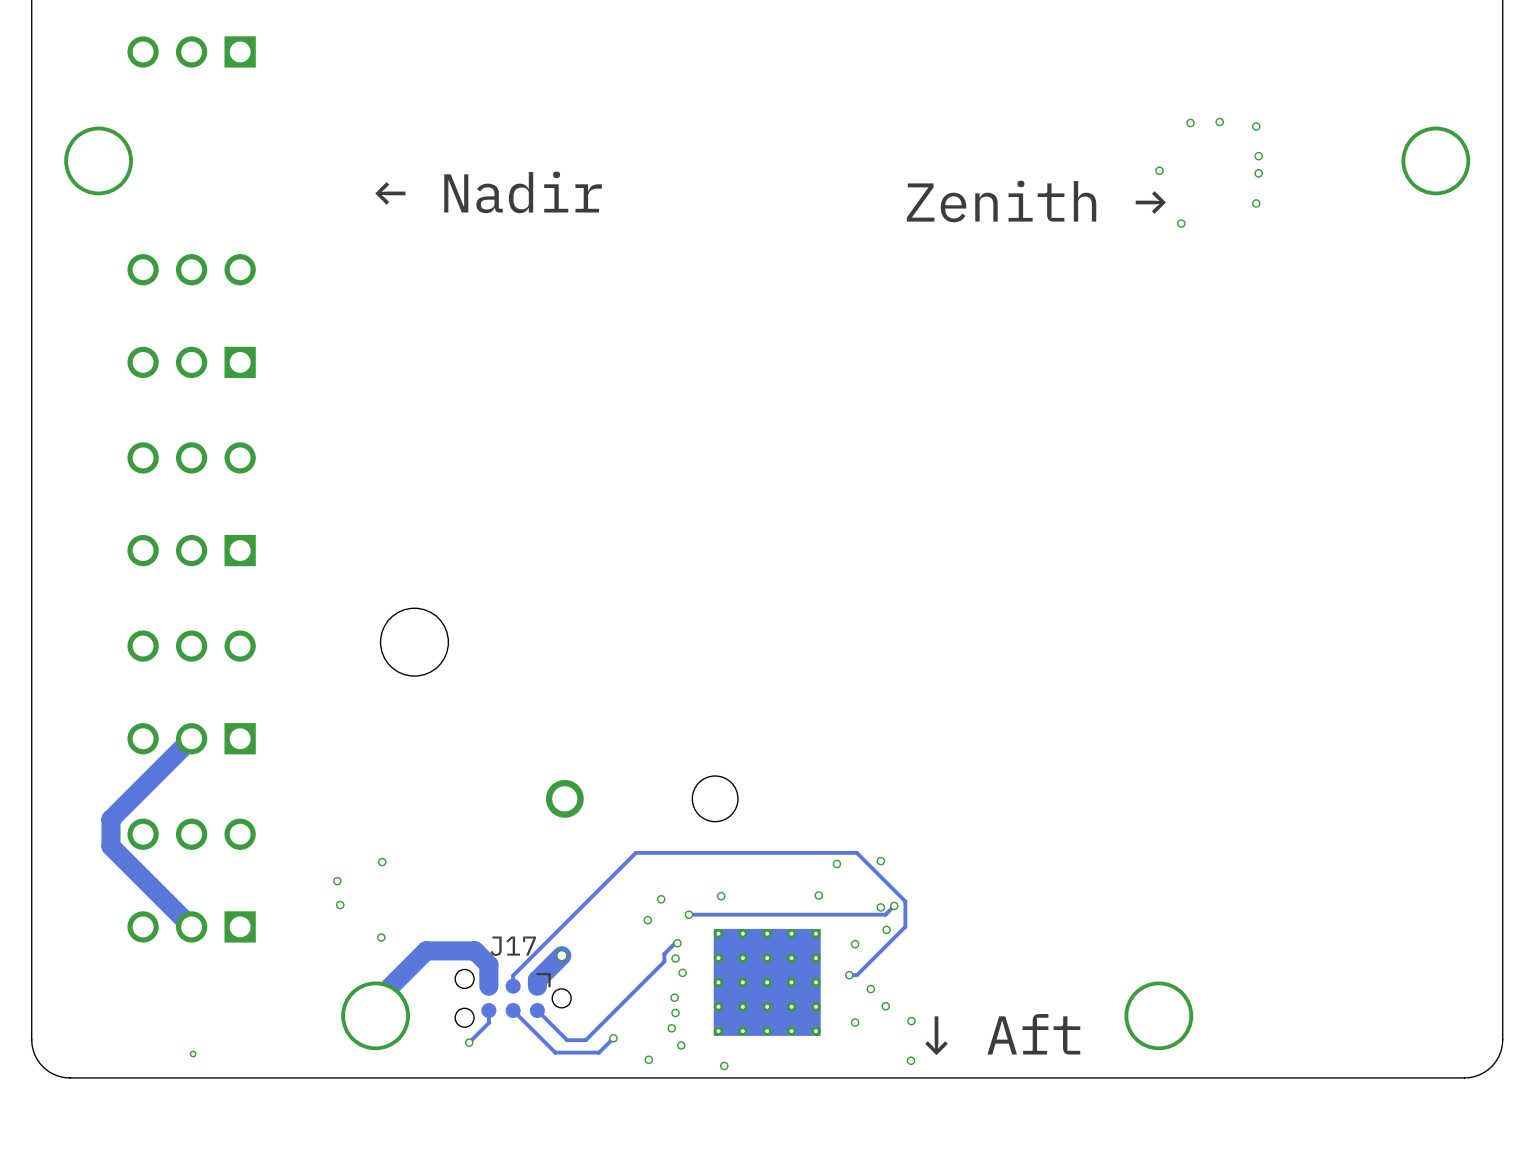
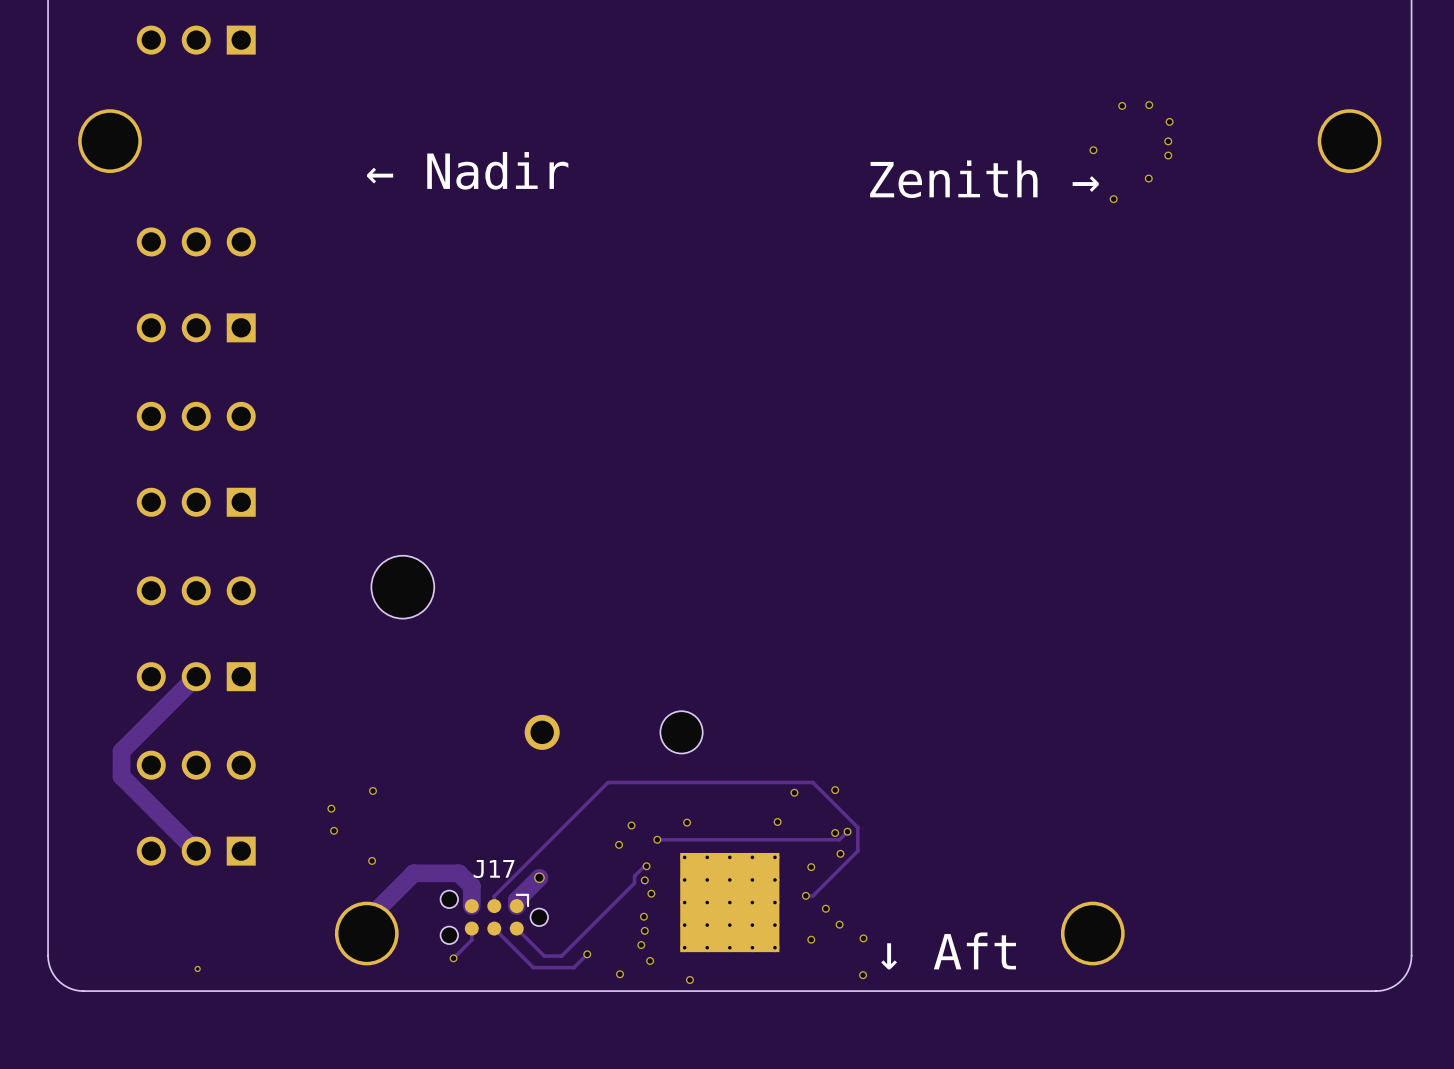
via: (1256, 126) -> none
via: none -> (1169, 121)
via: (1258, 156) -> none
via: none -> (1168, 141)
via: (1258, 173) -> none
via: none -> (1168, 155)
via: none -> (1148, 178)
via: (1256, 203) -> none

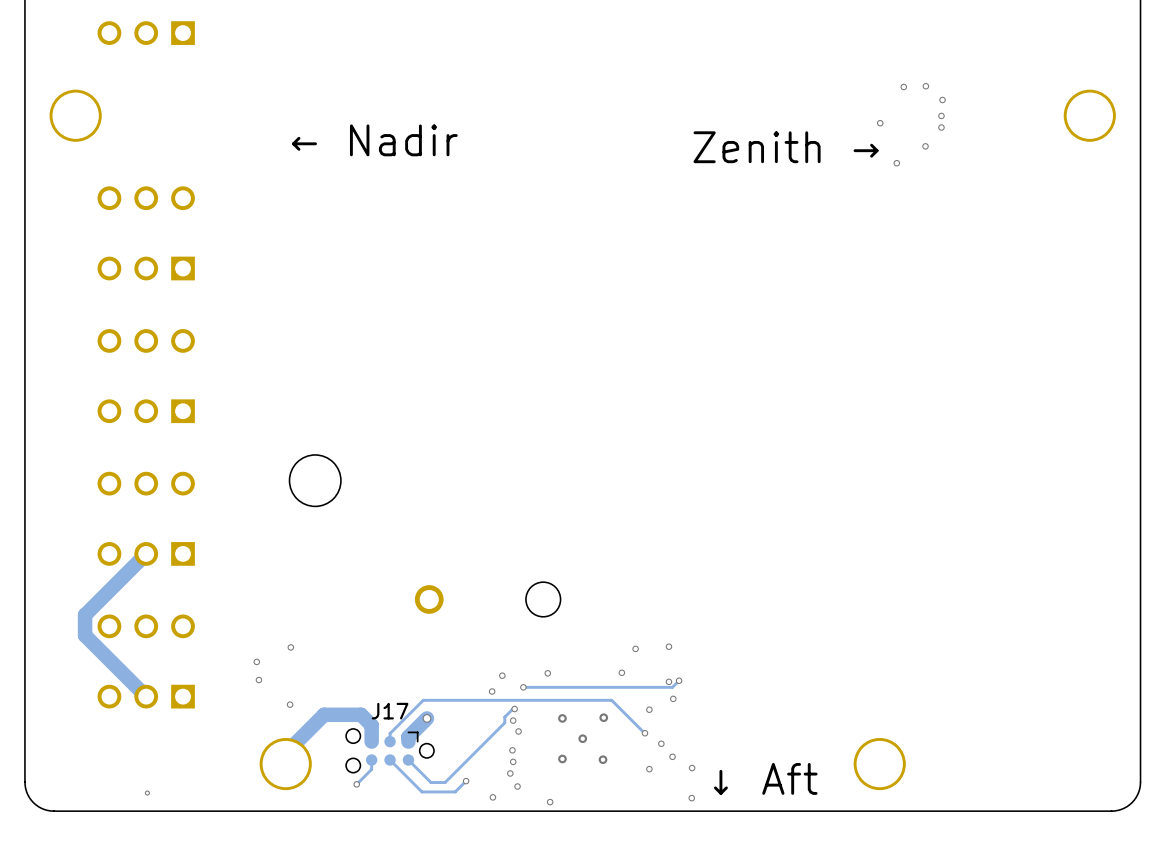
track: (534, 855) (608, 782) (812, 782) (857, 827) (857, 851) (813, 895) (805, 895) -> (423, 700) (611, 700) (644, 733)
via: none -> (603, 717)
via: none -> (562, 718)
part: (729, 902) -> none
via: none -> (582, 738)
via: none -> (562, 758)
via: none -> (603, 759)

